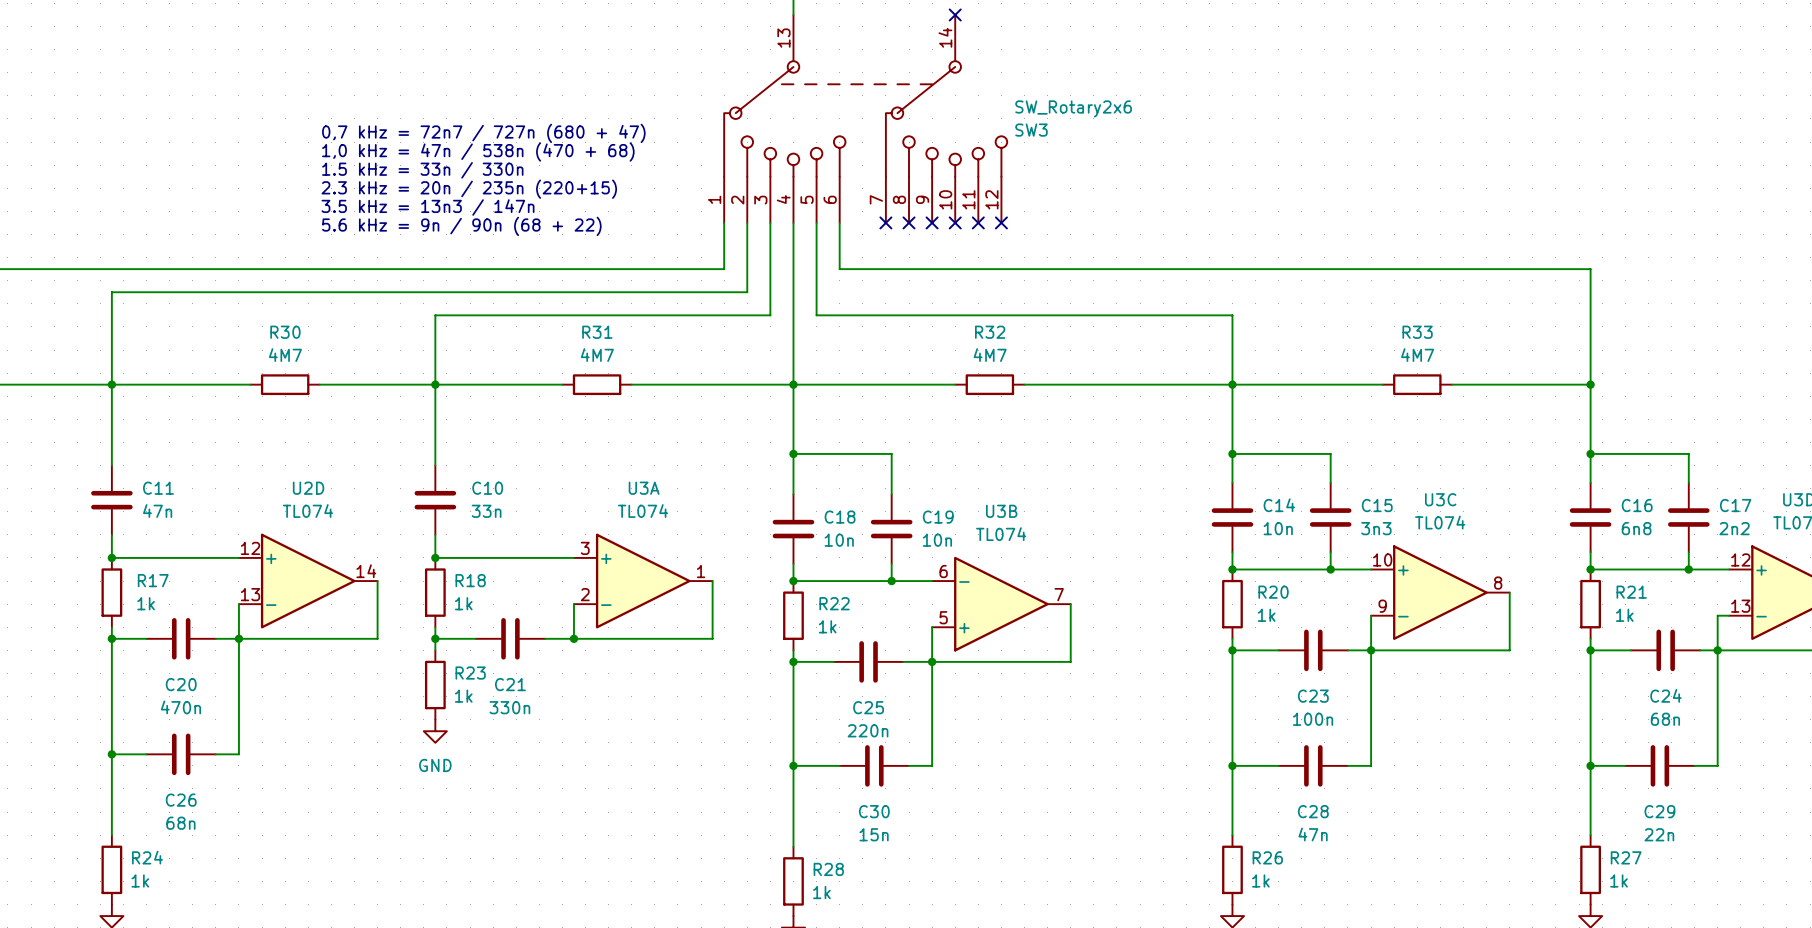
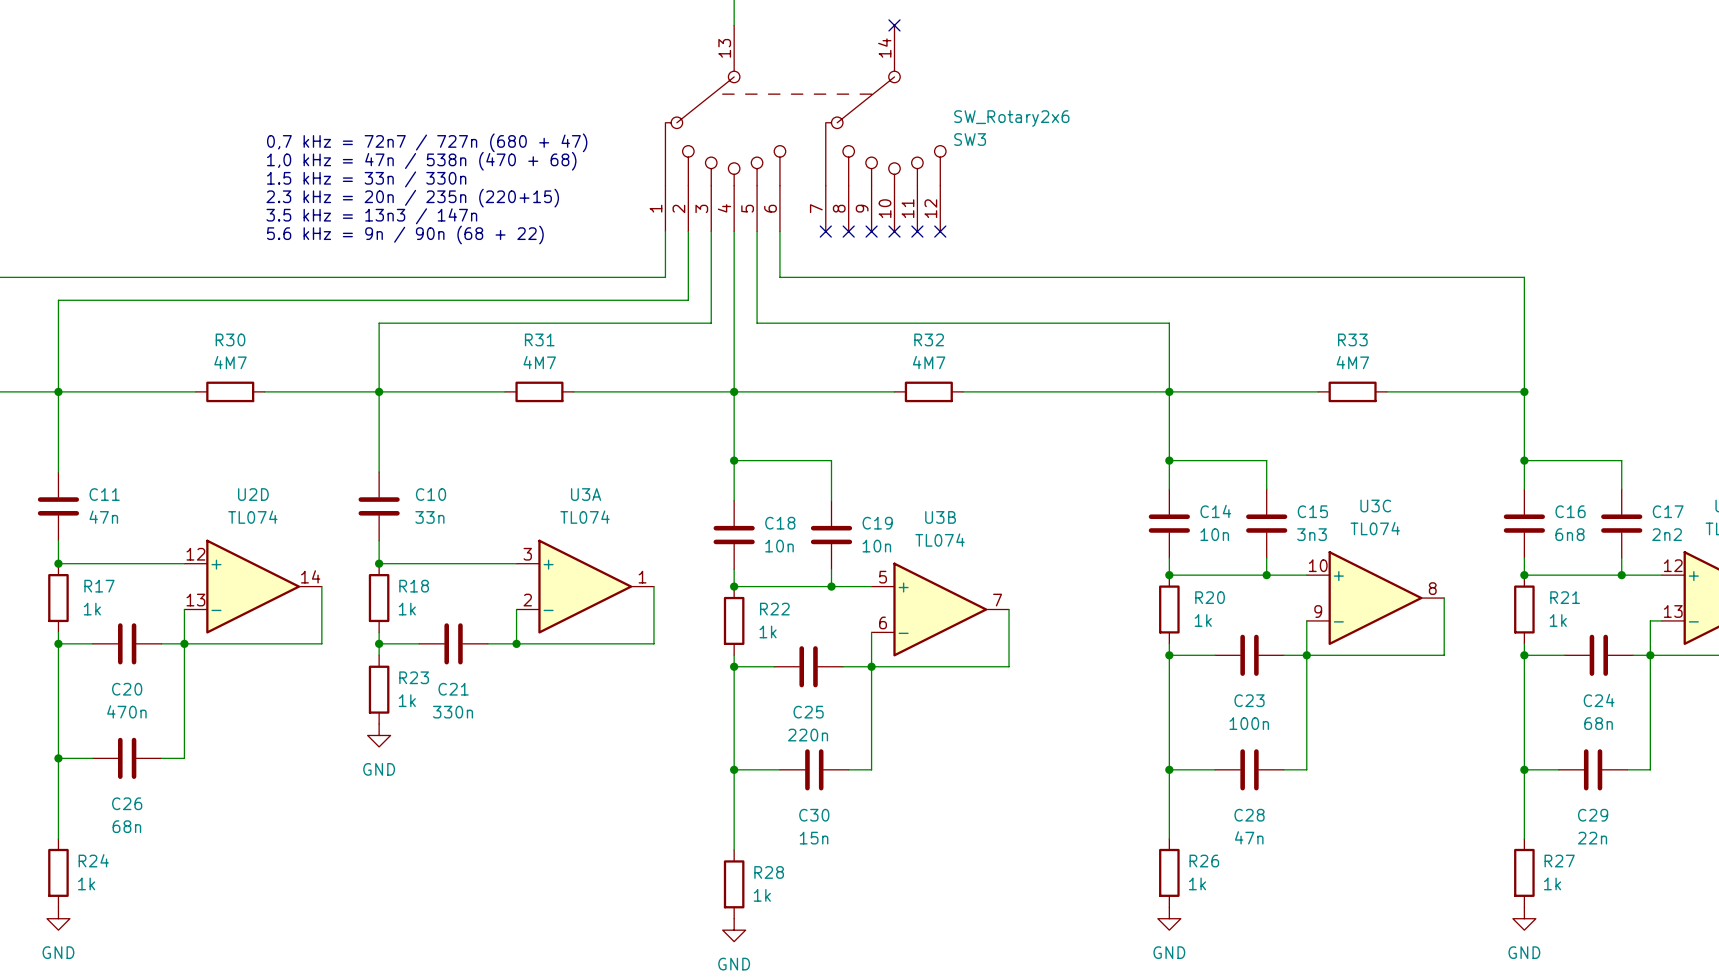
U3B flip: as is (1001, 604) -> up-down (940, 609)

